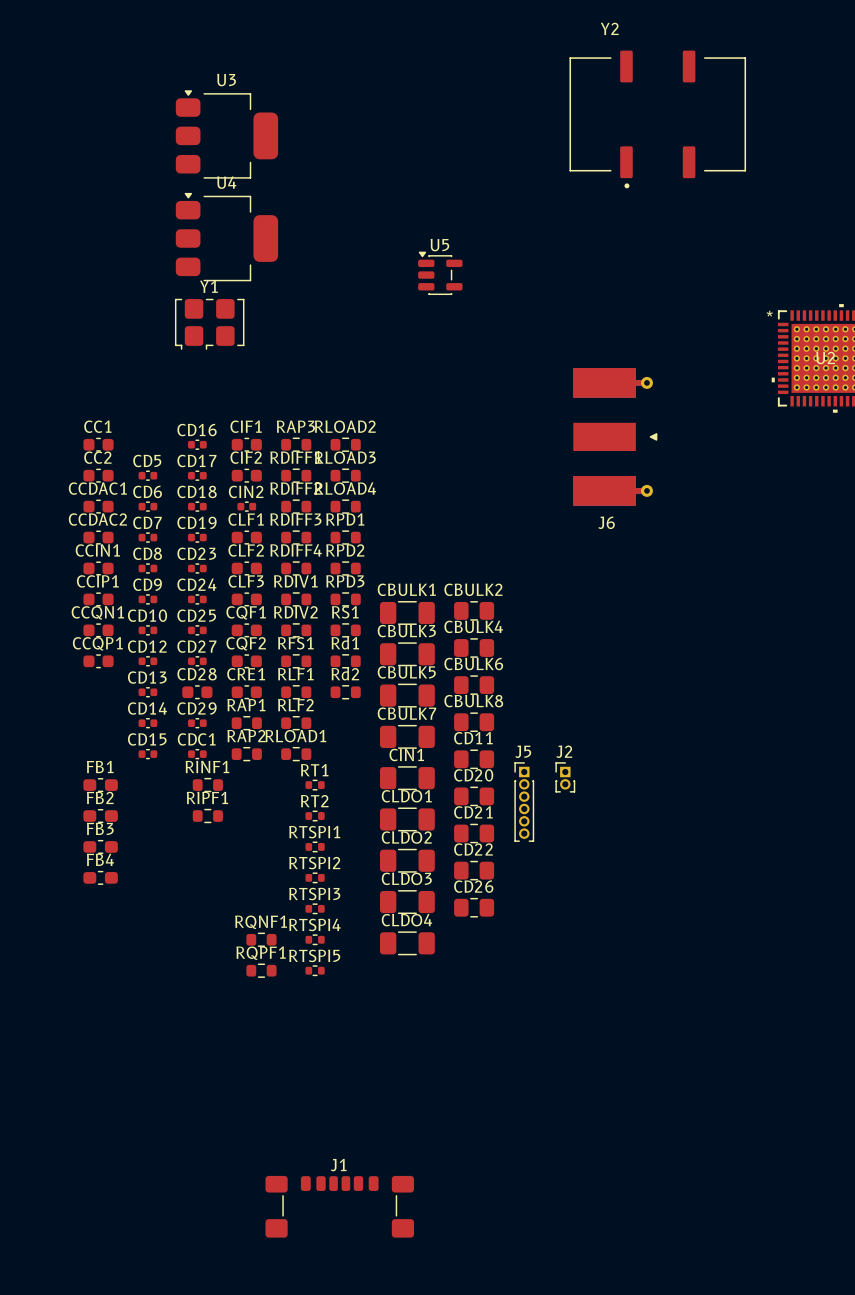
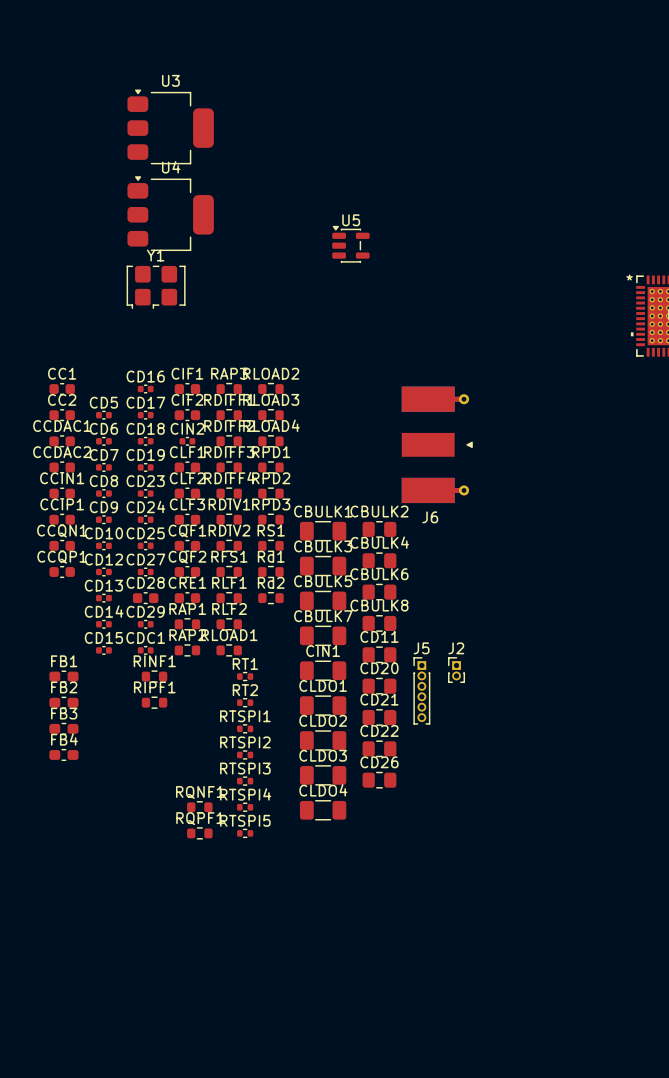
Y2: (657, 119) -> none
J6 position: (615, 436) -> (437, 444)
J1: (339, 1206) -> none

